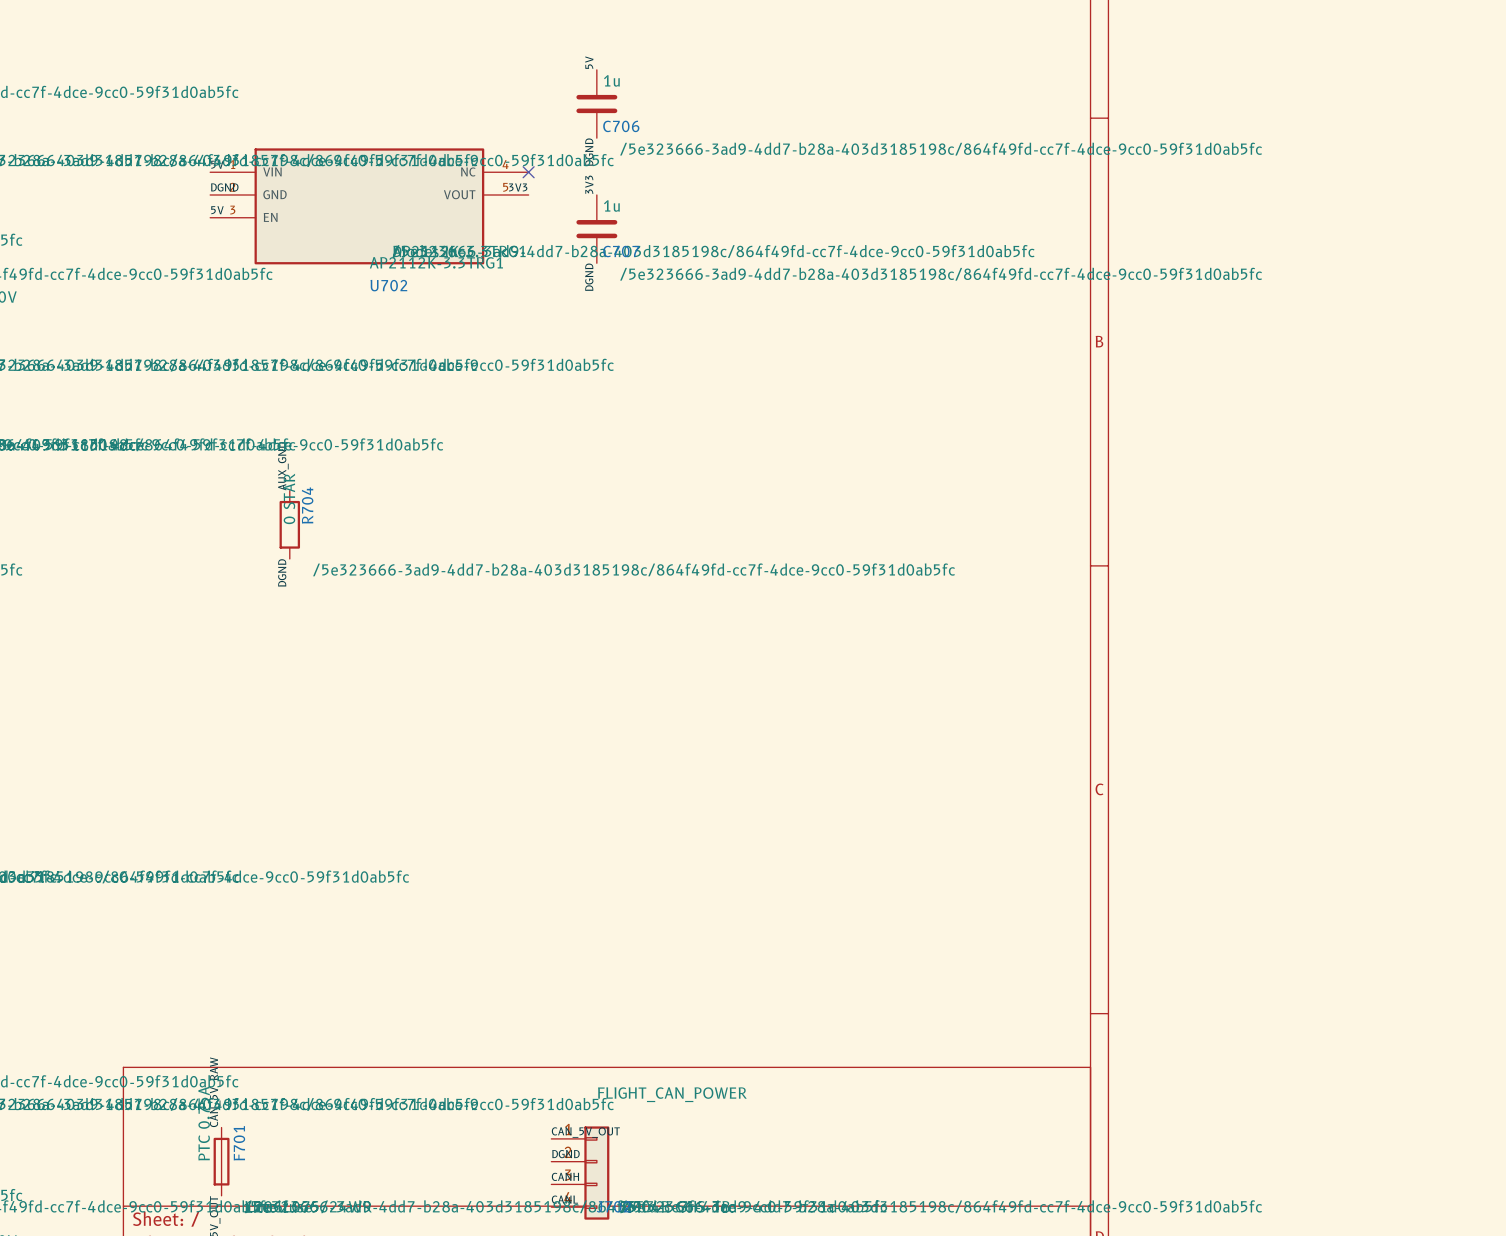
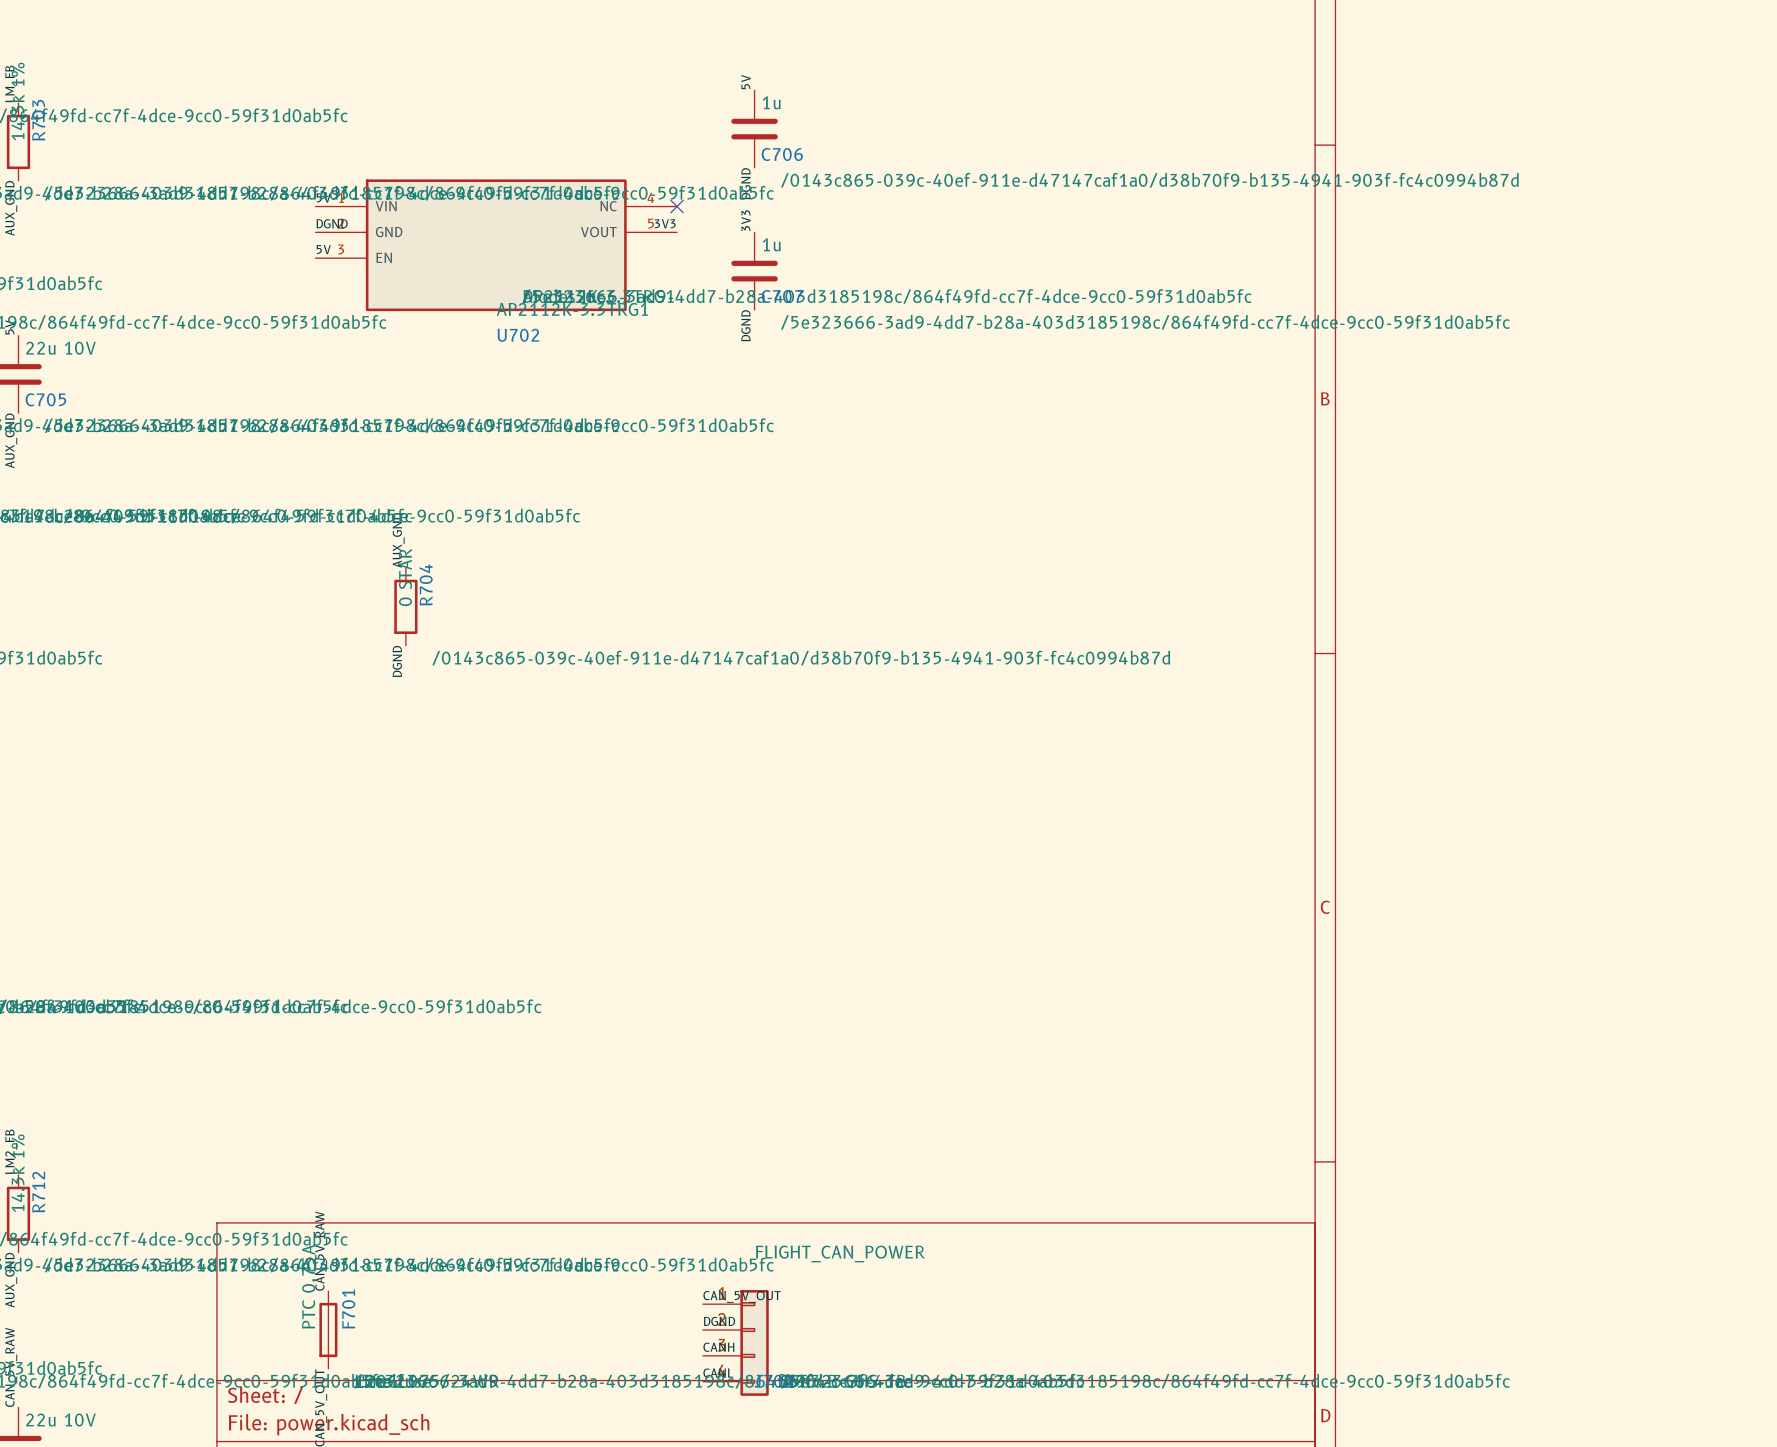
C706 text: /5e323666-3ad9-4dd7-b28a-403d3185198c/864f49fd-cc7f-4dce-9cc0-59f31d0ab5fc (941, 149) -> /0143c865-039c-40ef-911e-d47147caf1a0/d38b70f9-b135-4941-903f-fc4c0994b87d (1149, 180)
R704 text: /5e323666-3ad9-4dd7-b28a-403d3185198c/864f49fd-cc7f-4dce-9cc0-59f31d0ab5fc (634, 569) -> /0143c865-039c-40ef-911e-d47147caf1a0/d38b70f9-b135-4941-903f-fc4c0994b87d (801, 658)

